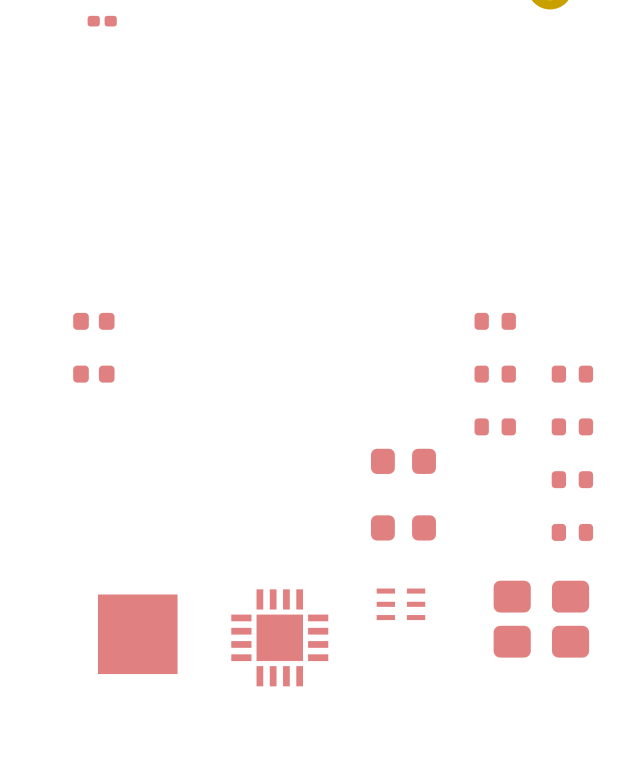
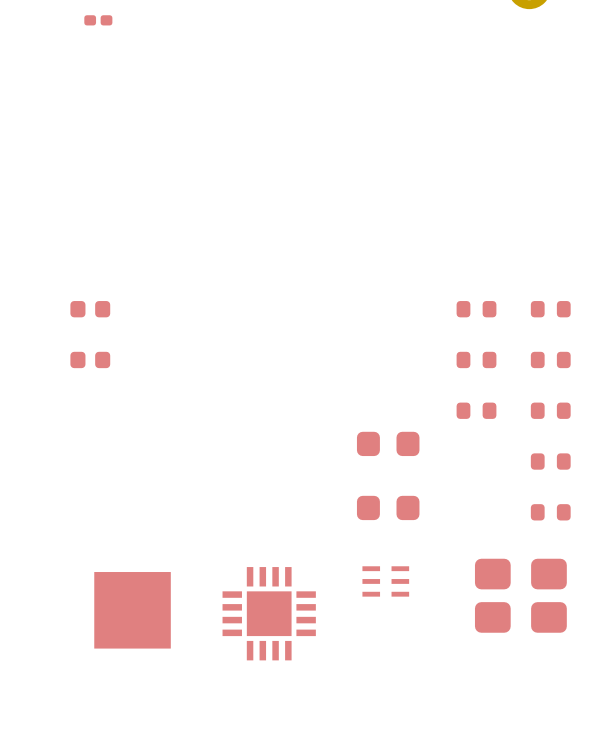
part: none -> (550, 309)

